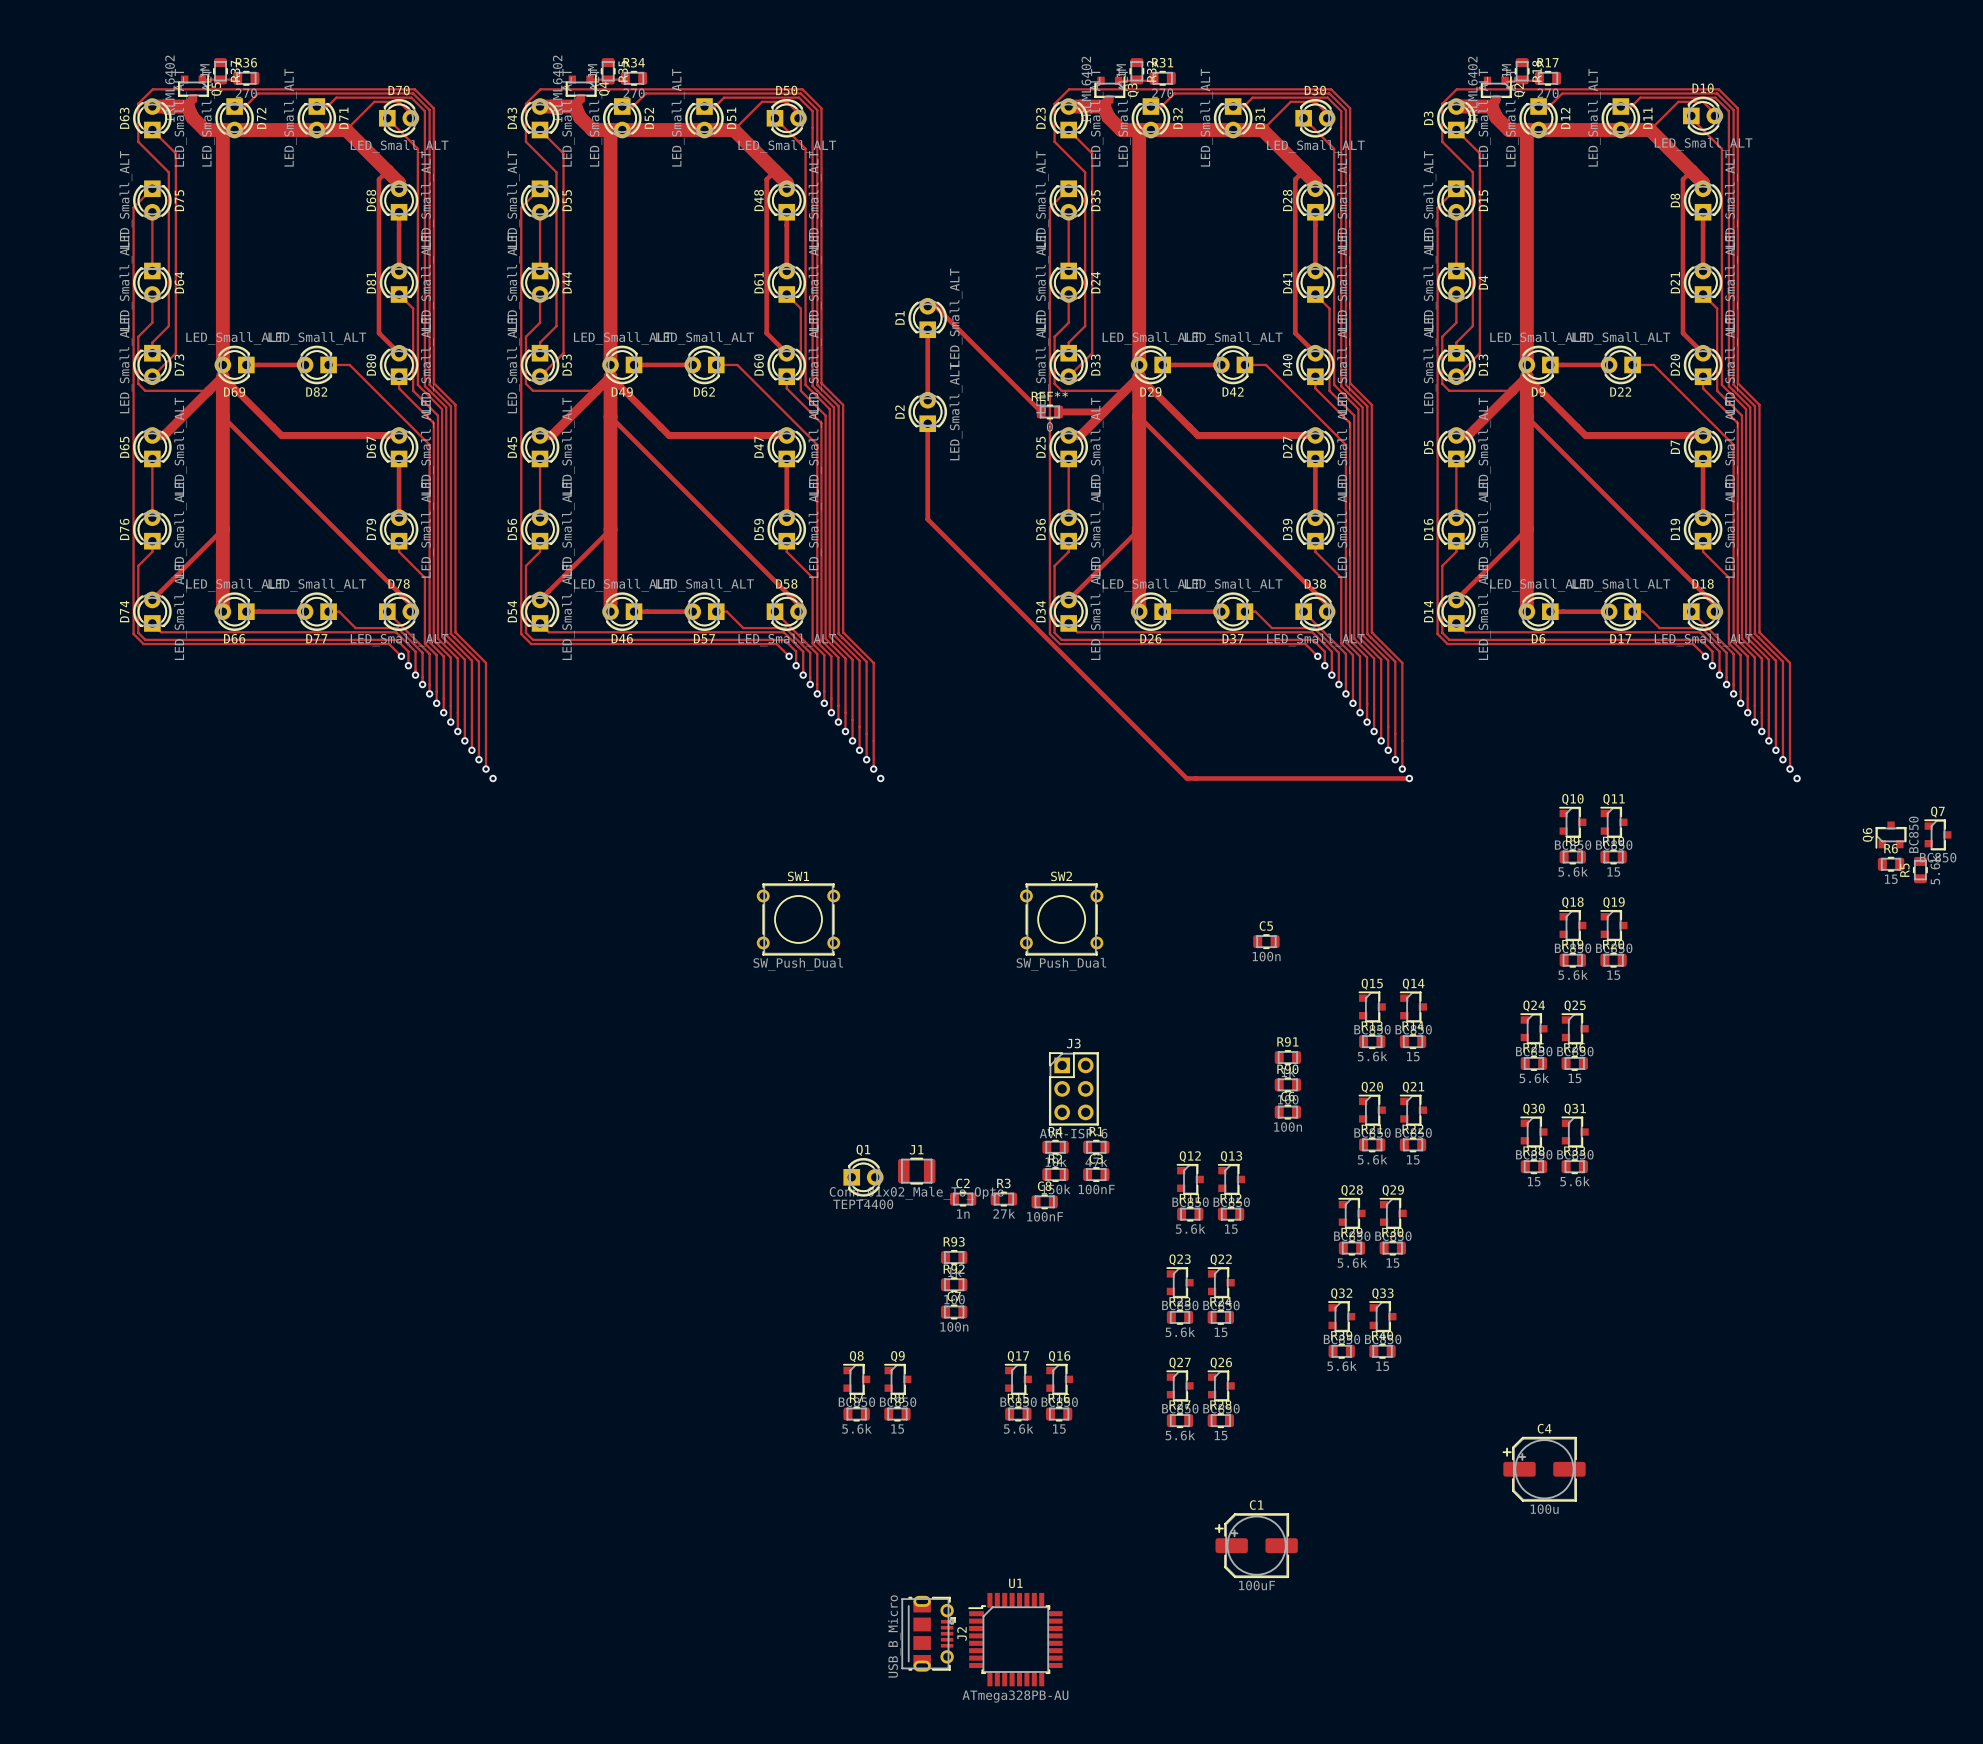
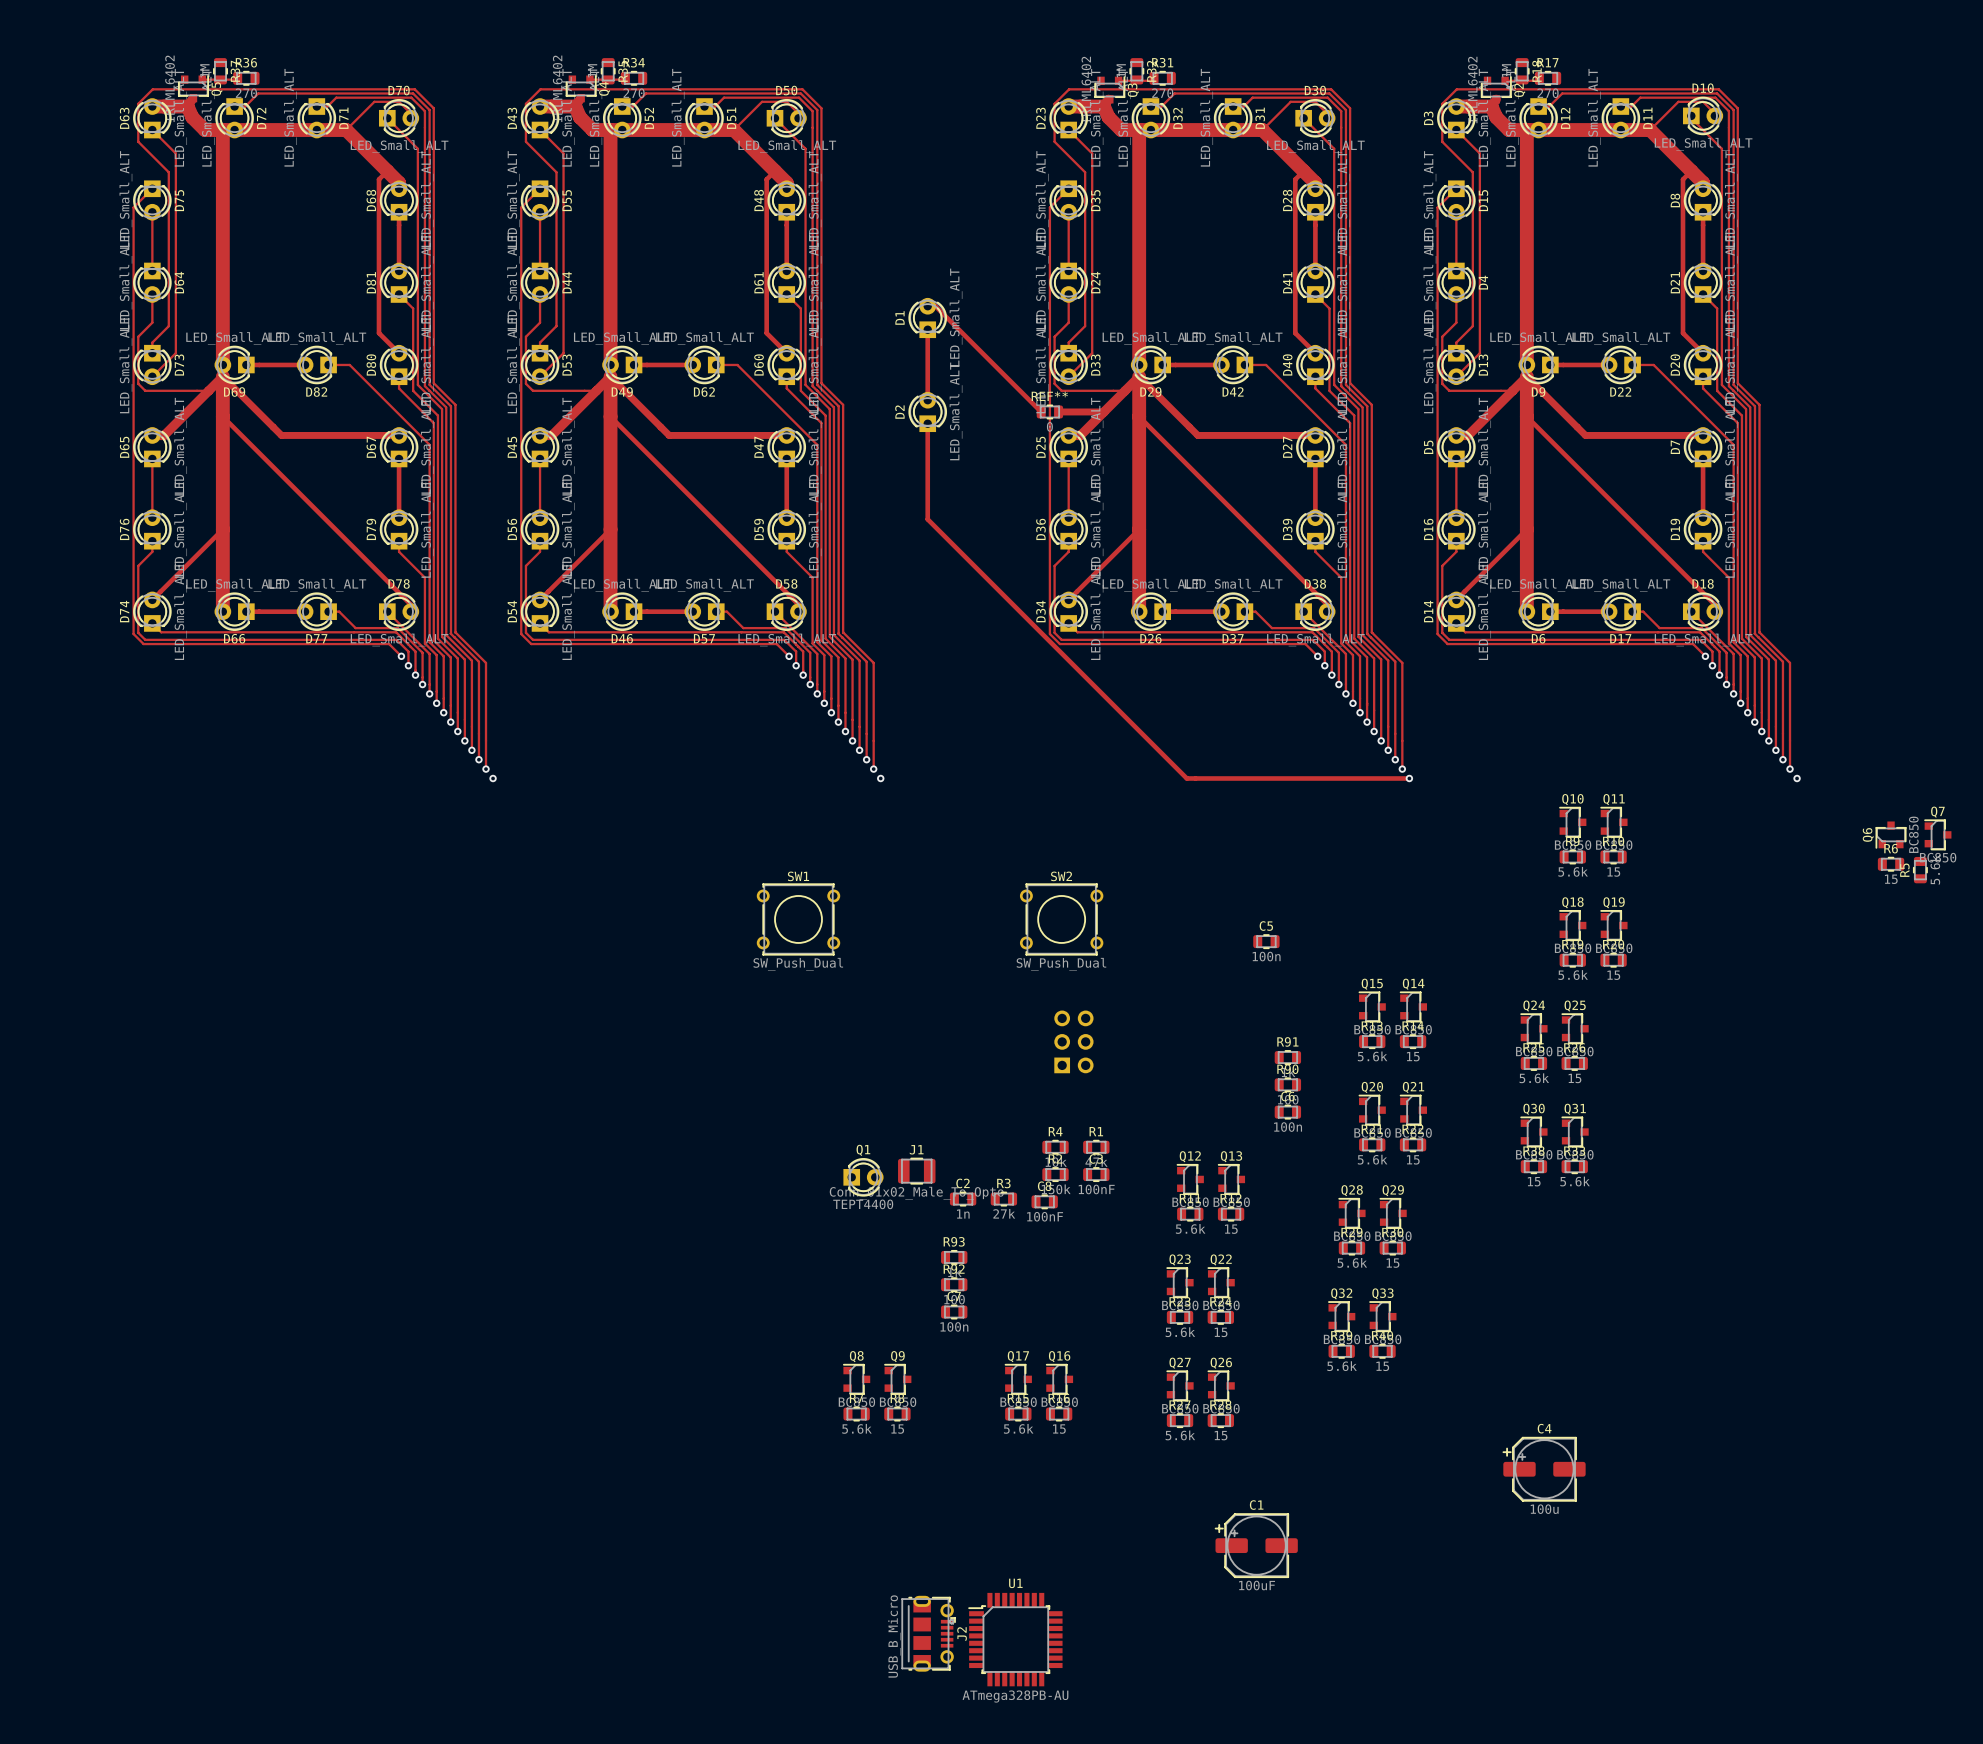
J3 side: top (1073, 1088) -> bottom (1073, 1041)

